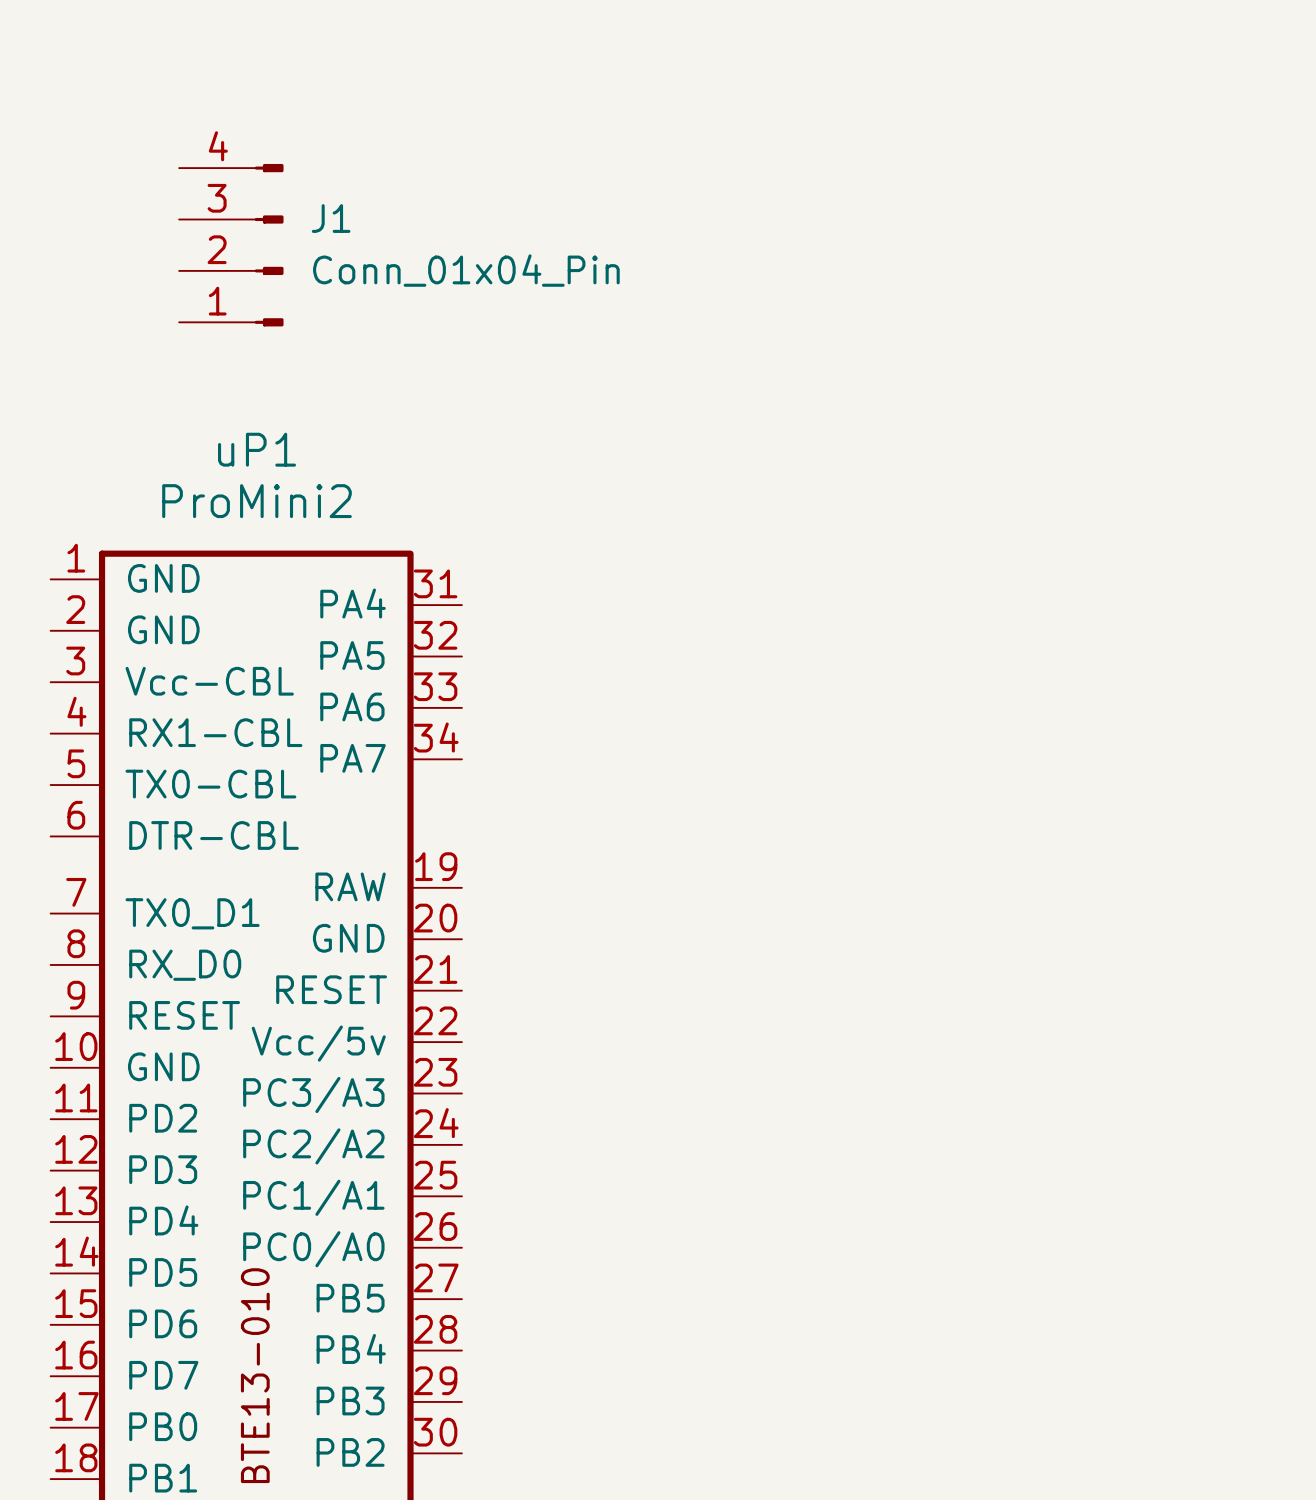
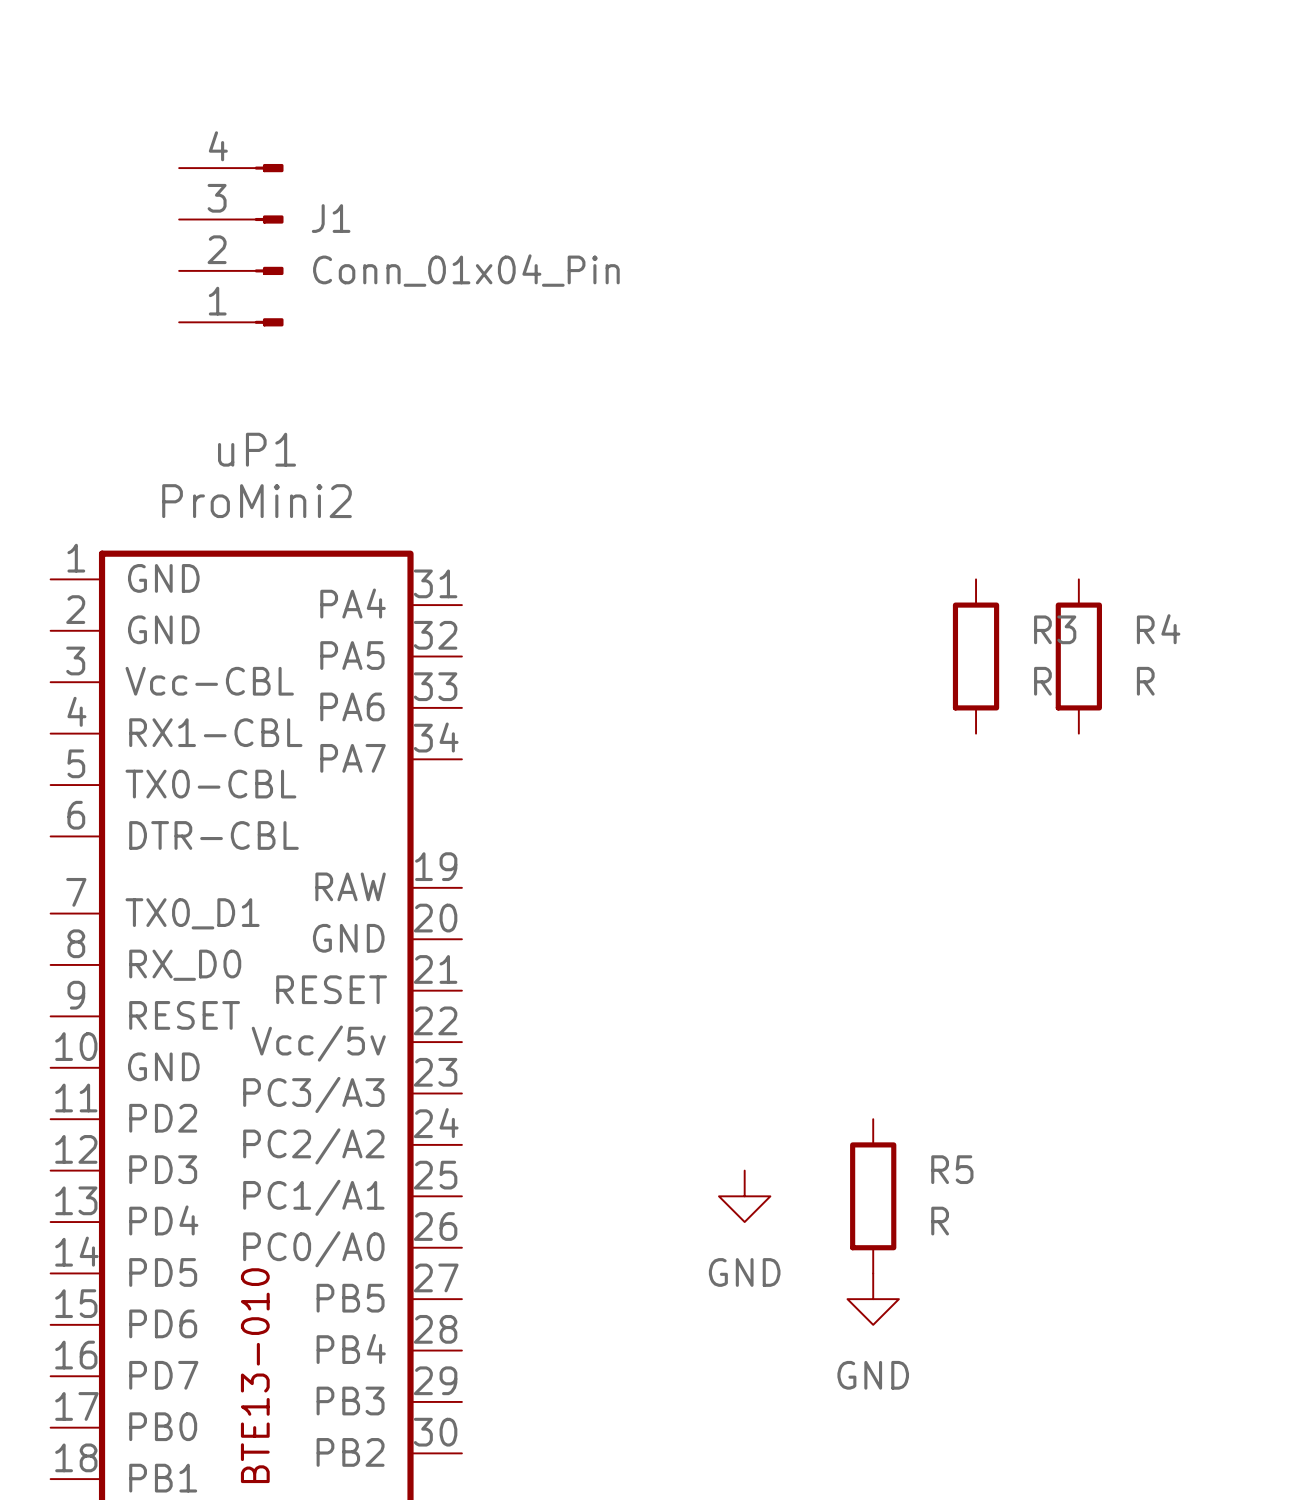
R3: none -> R (976, 656)
R4: none -> R (1078, 656)
power symbol: none -> GND (744, 1196)
R5: none -> R (873, 1196)
power symbol: none -> GND (873, 1299)

